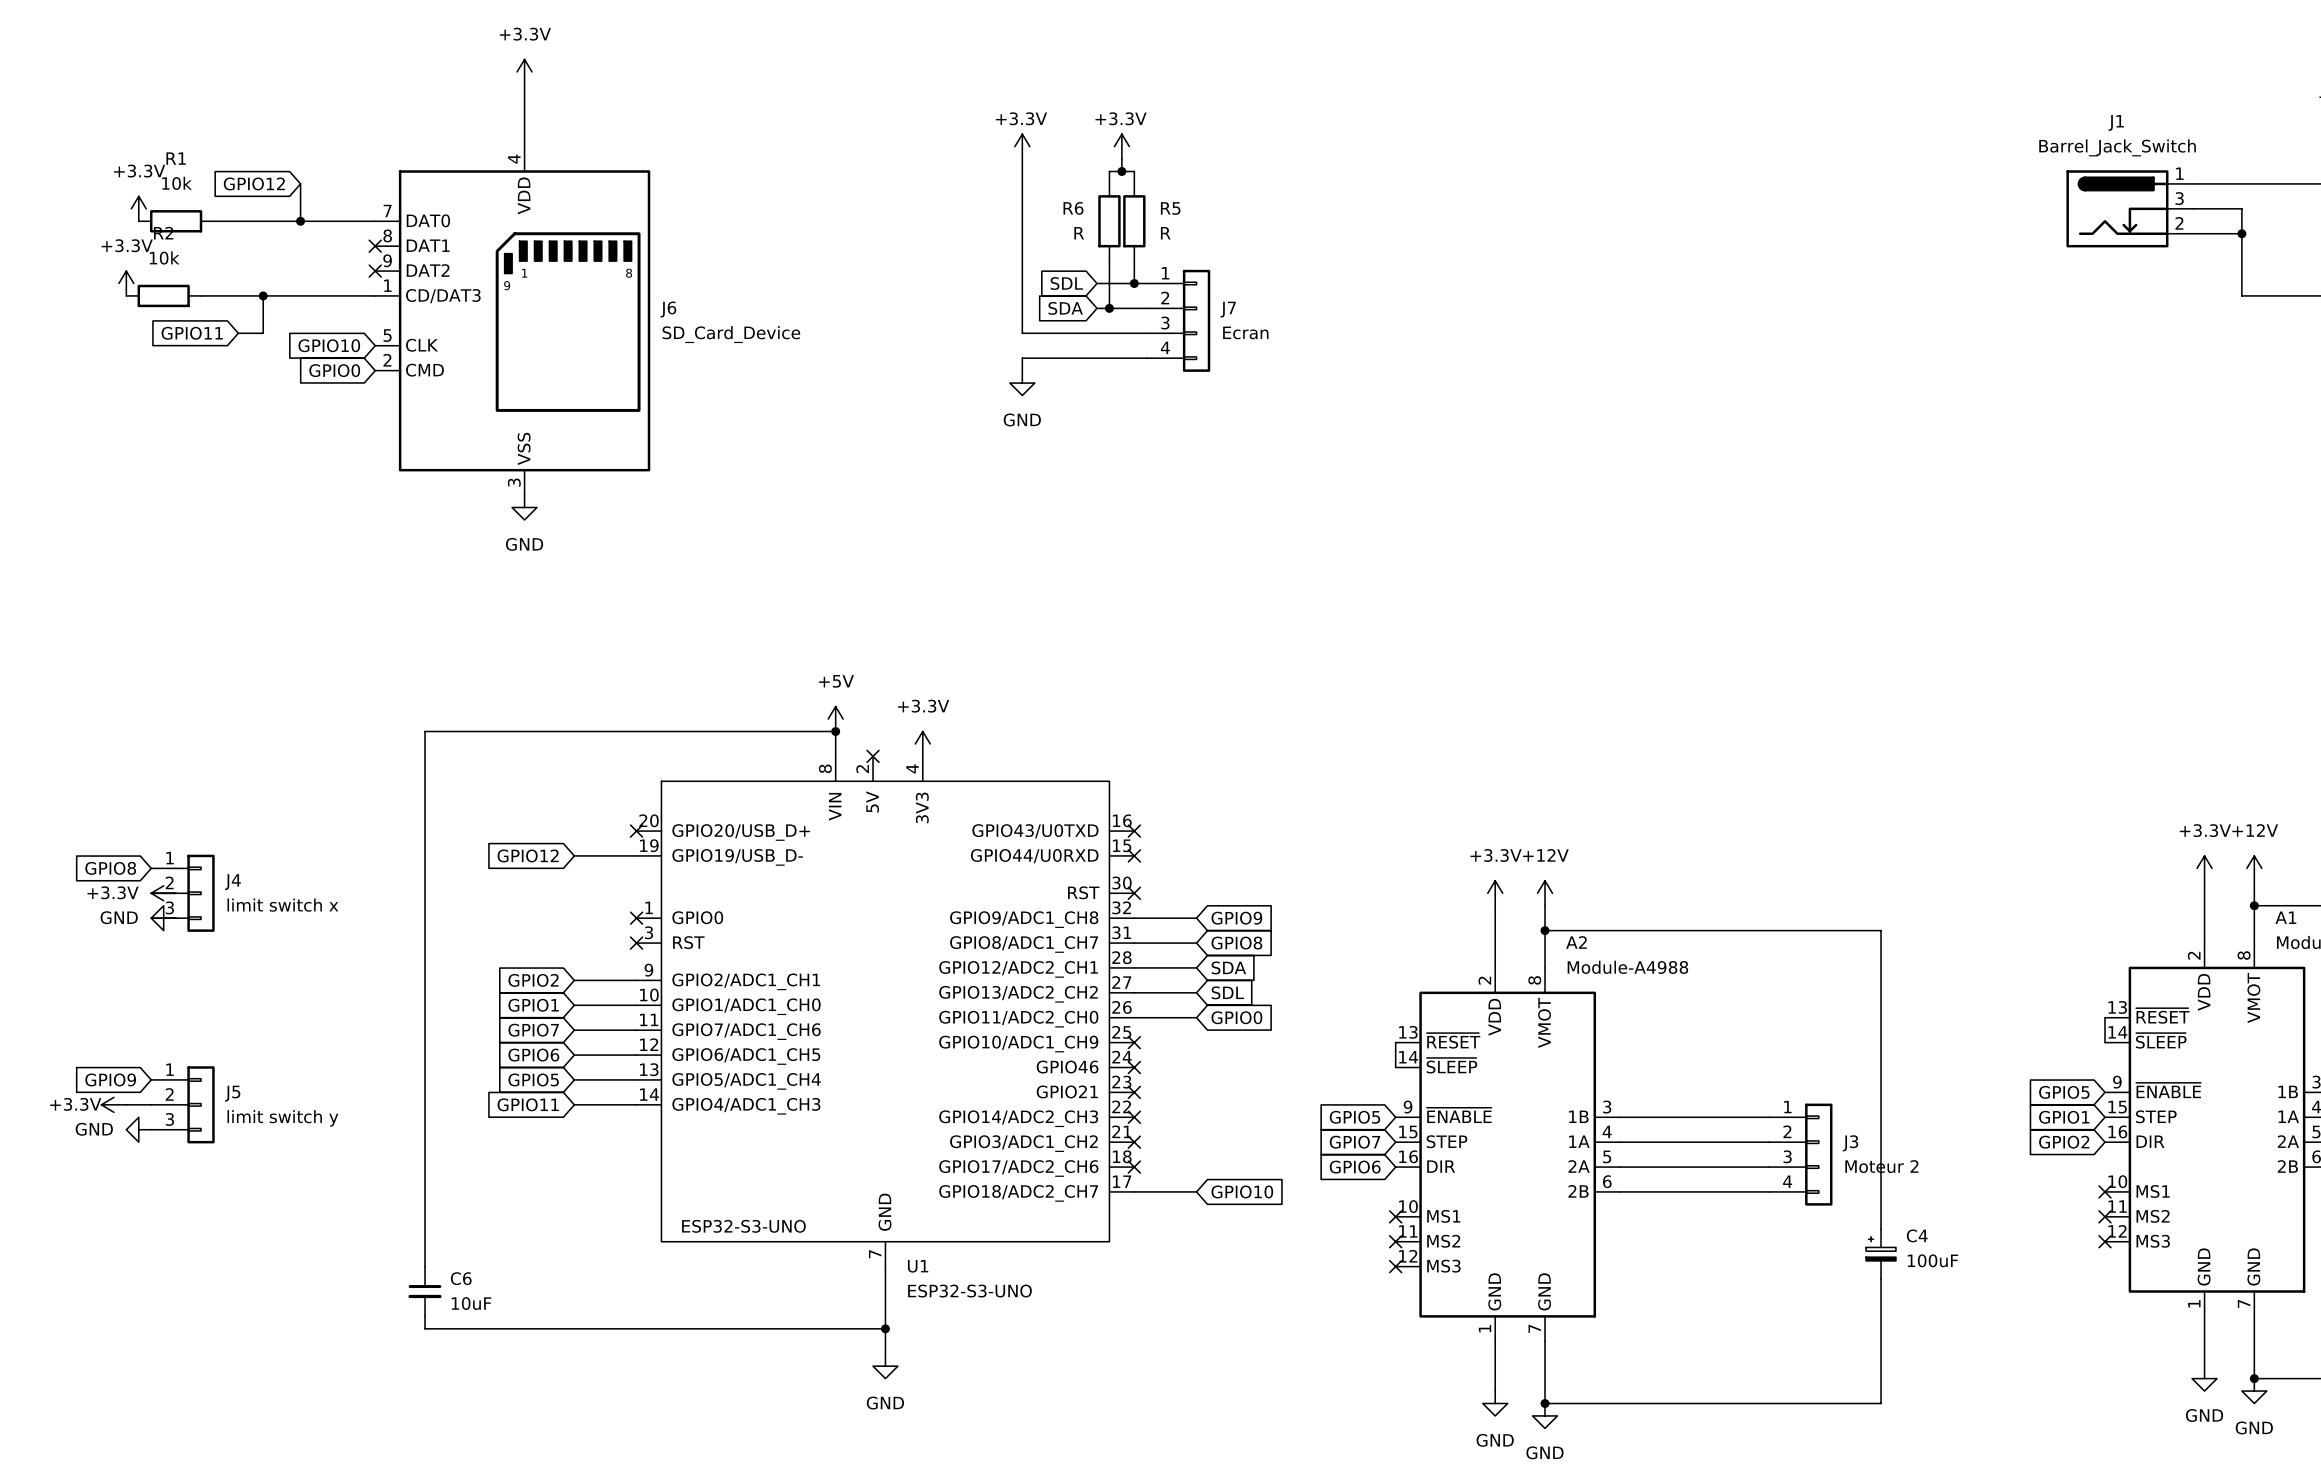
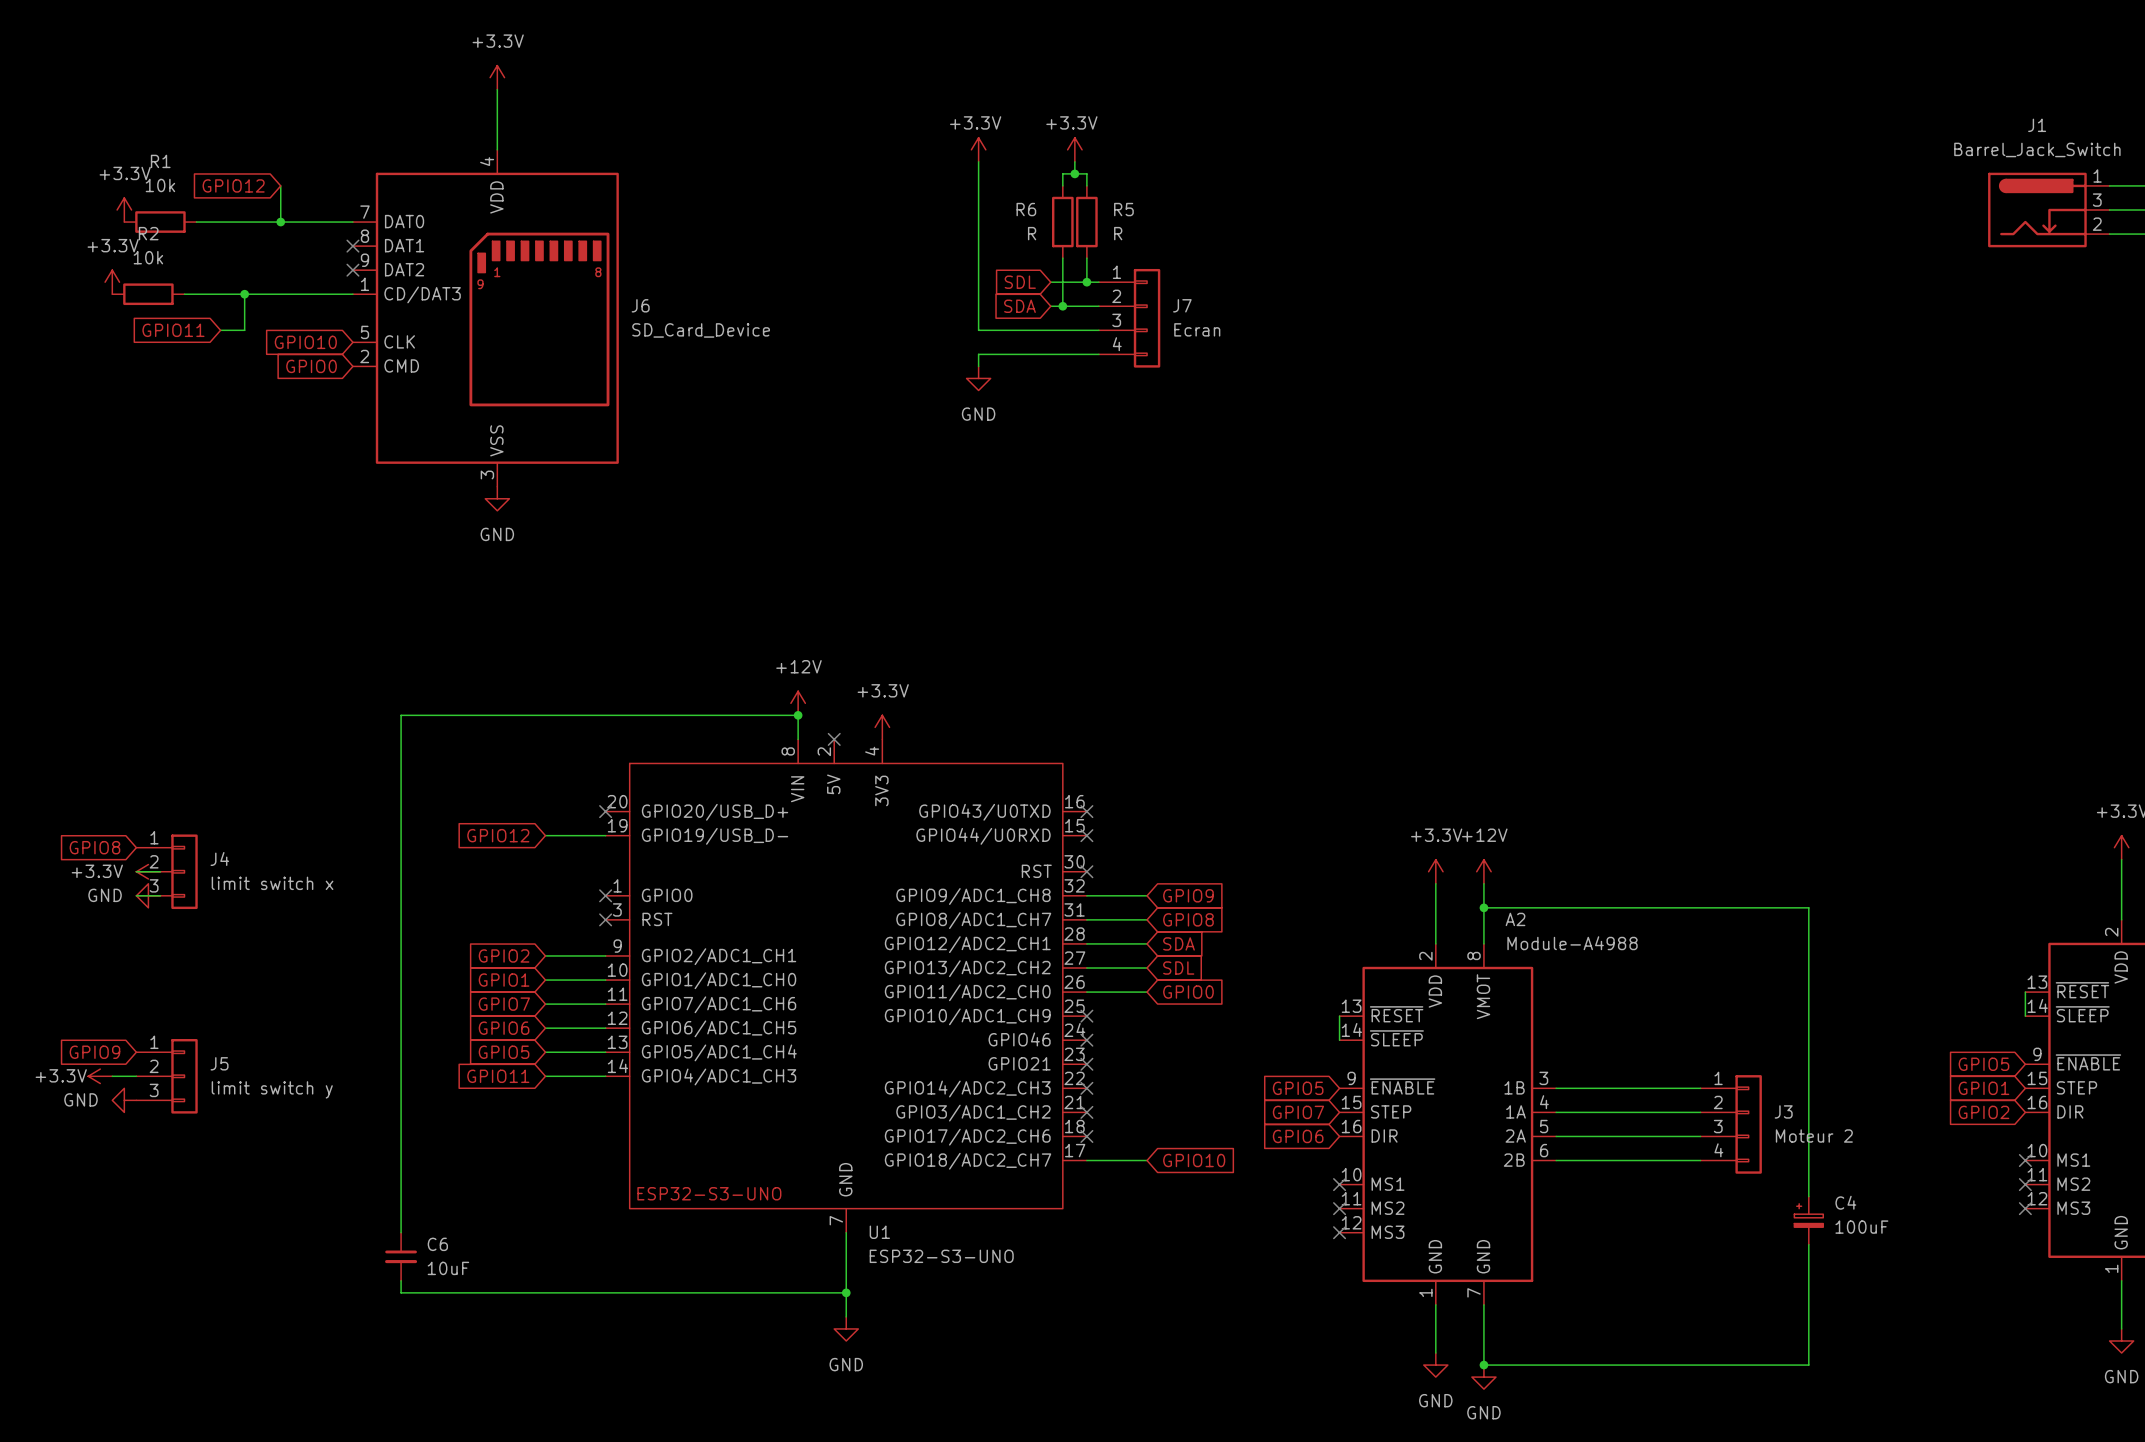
power symbol: +5V (835, 719) -> +12V (798, 703)

